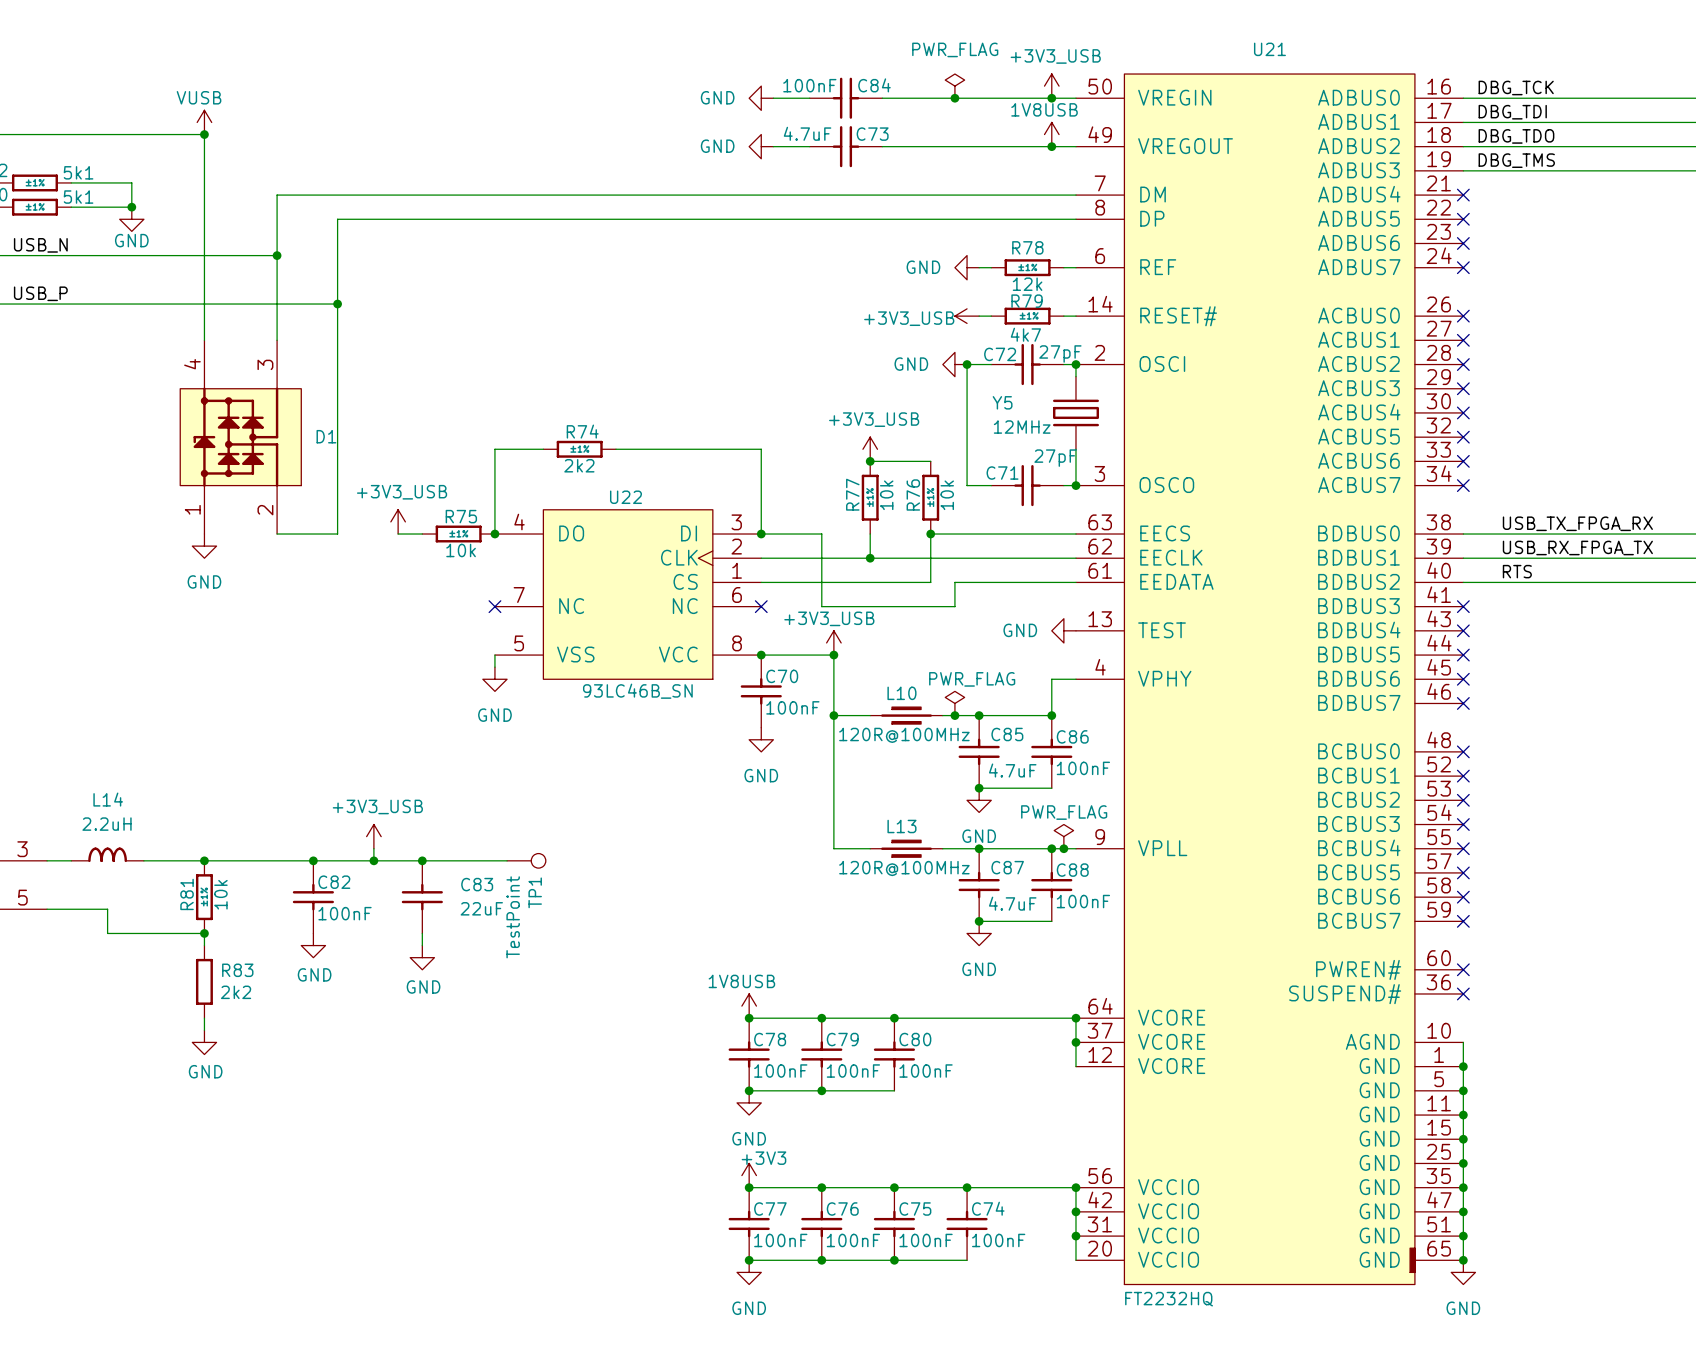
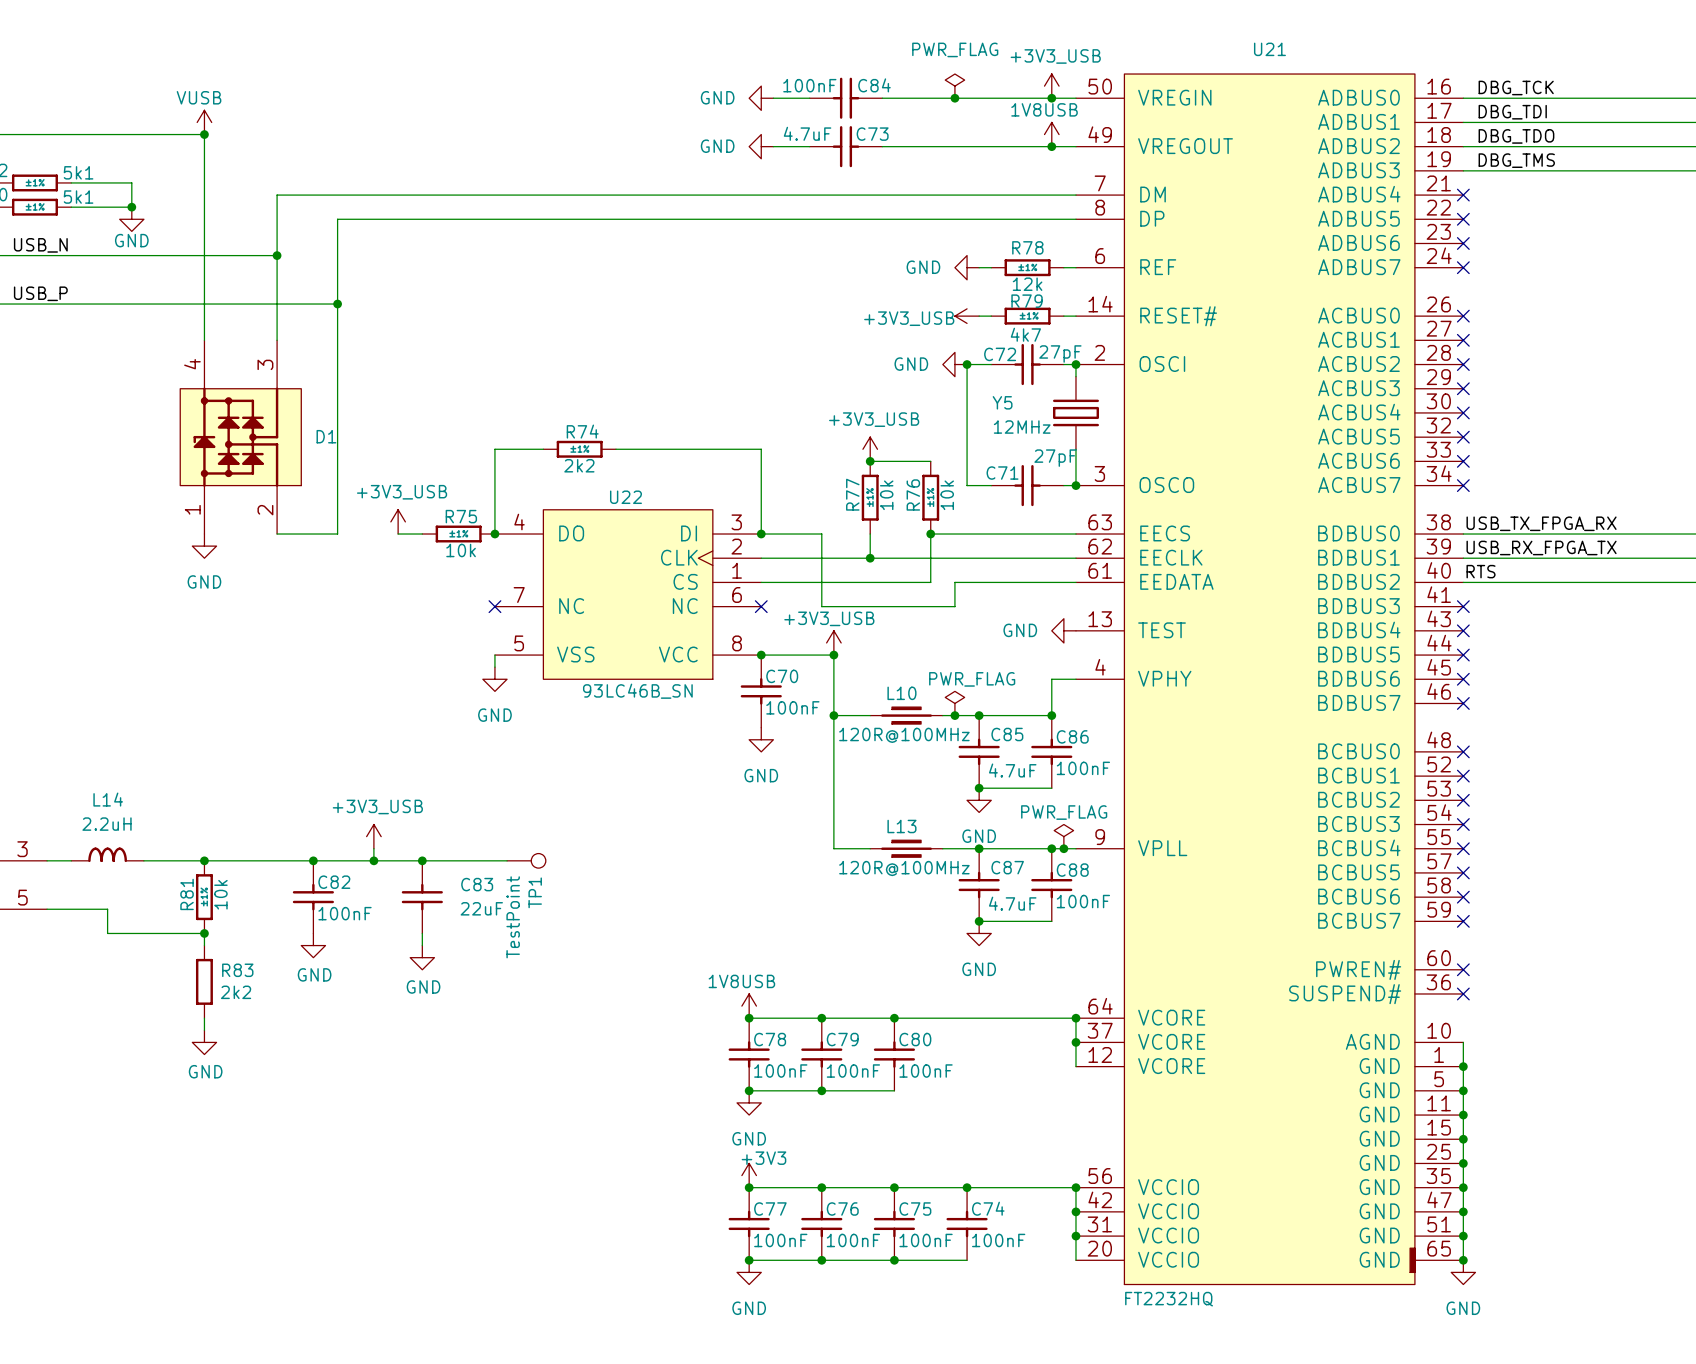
label position: USB_TX_FPGA_RX (1577, 523) -> USB_TX_FPGA_RX (1541, 523)
label position: USB_RX_FPGA_TX (1577, 547) -> USB_RX_FPGA_TX (1541, 547)
label position: RTS (1517, 571) -> RTS (1481, 571)

